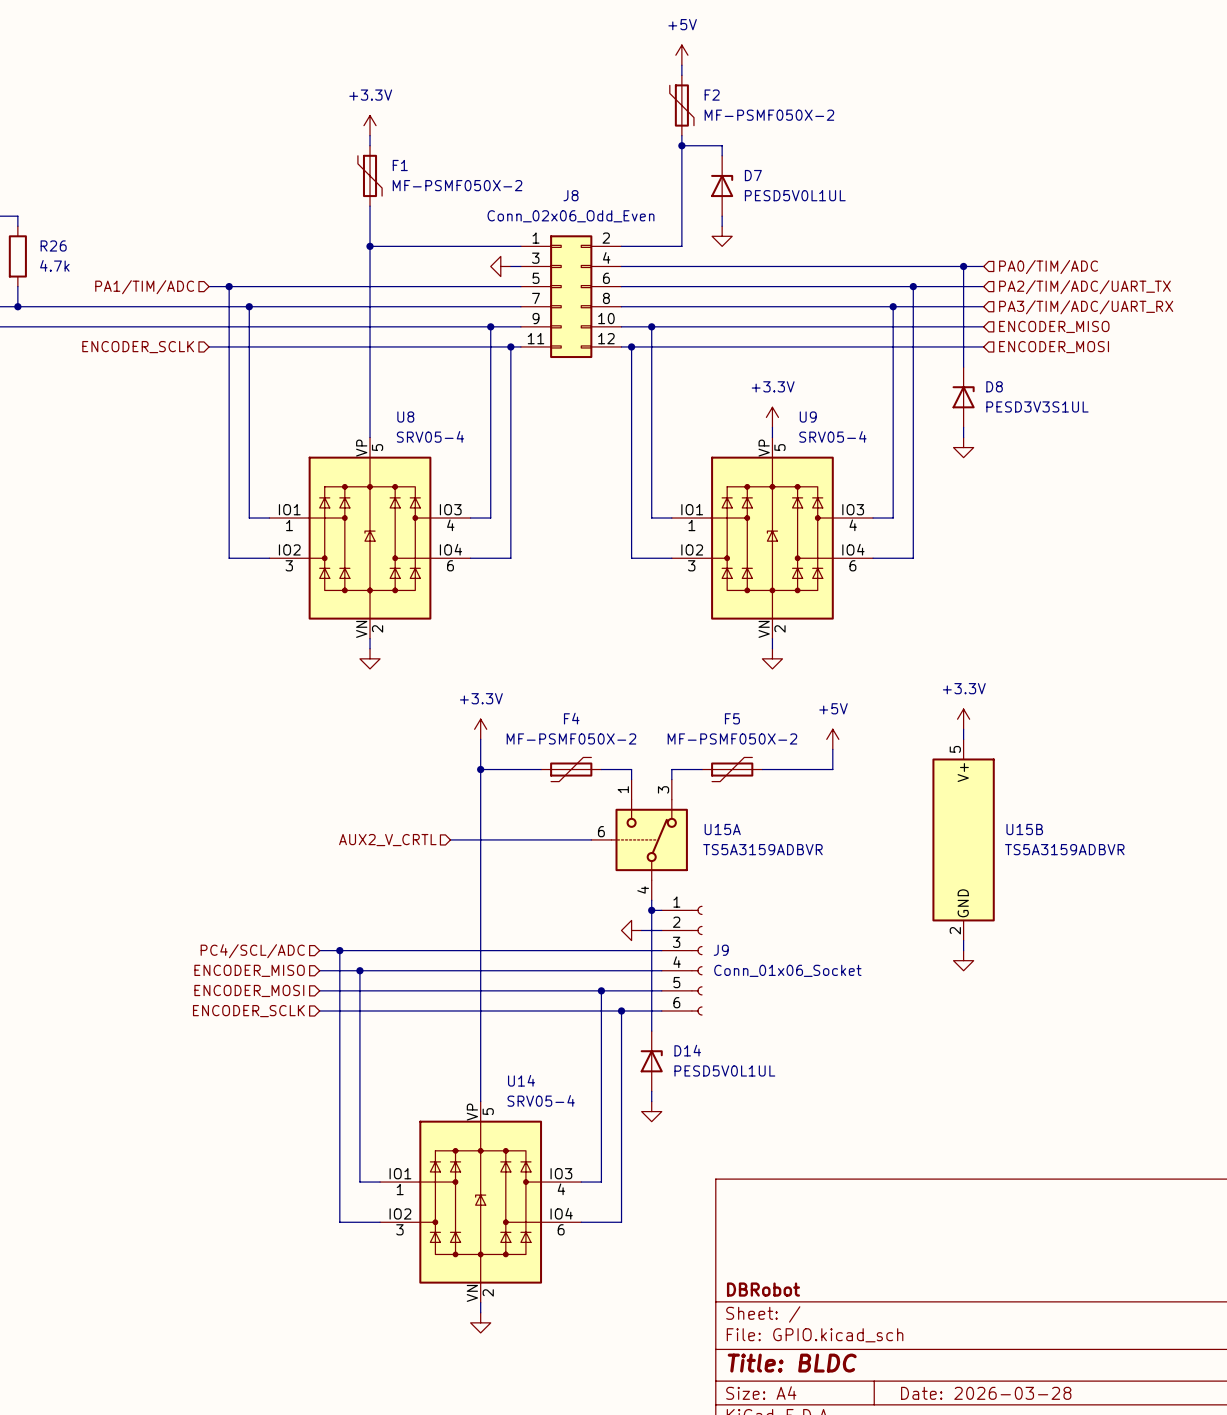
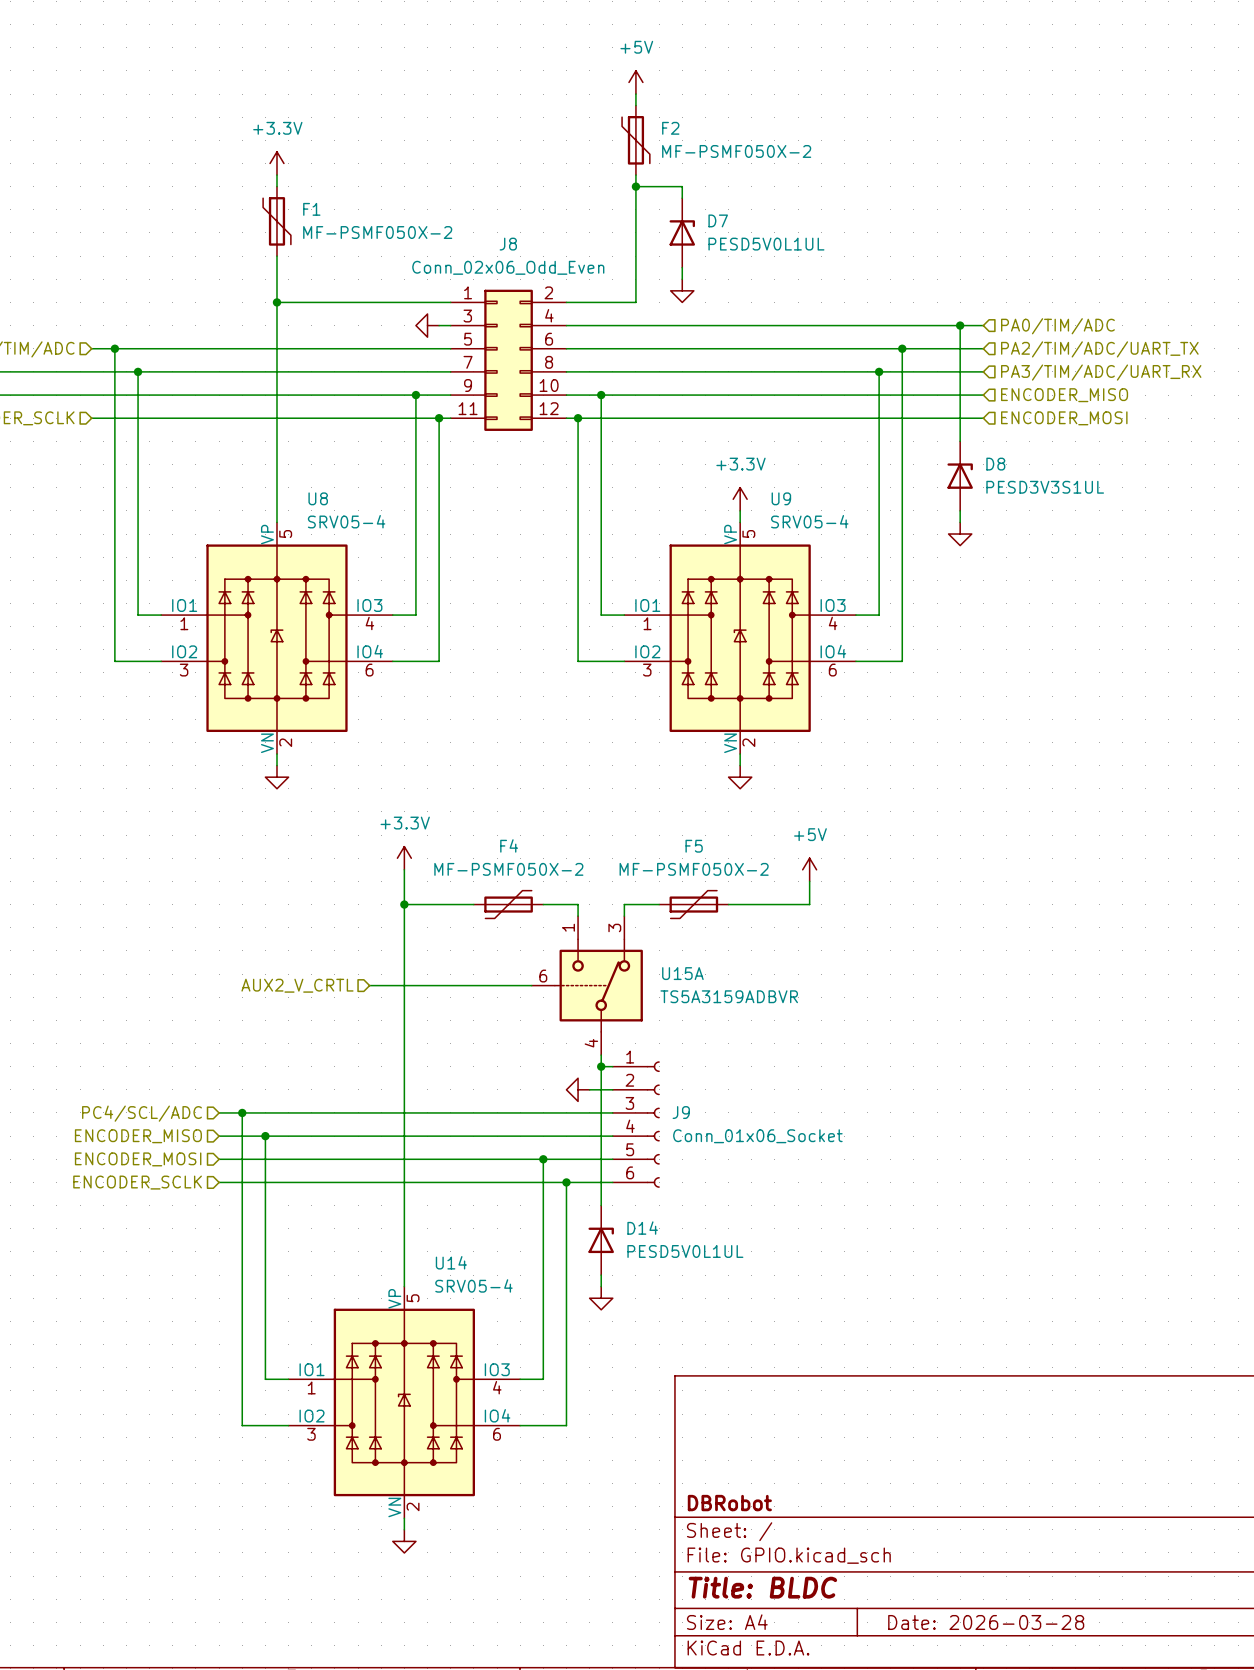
power symbol: +3.3V (963, 719) -> none
wire: (963, 729) (963, 739) -> none
U15B: TS5A3159ADBVR (963, 839) -> none
wire: (963, 940) (963, 950) -> none
power symbol: (963, 960) -> none

